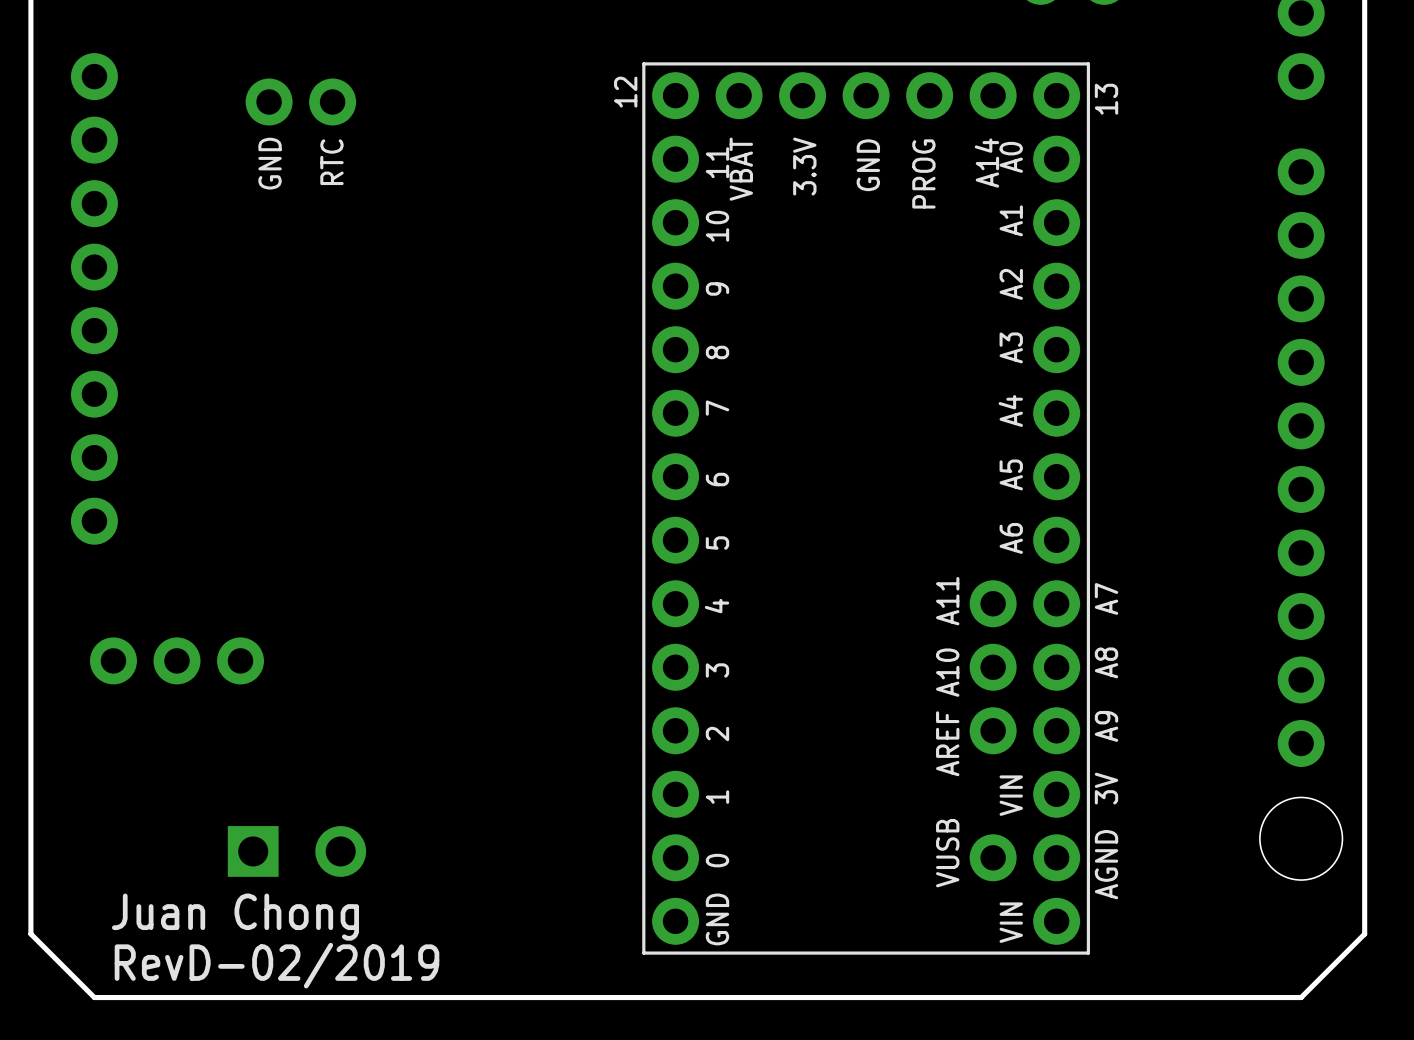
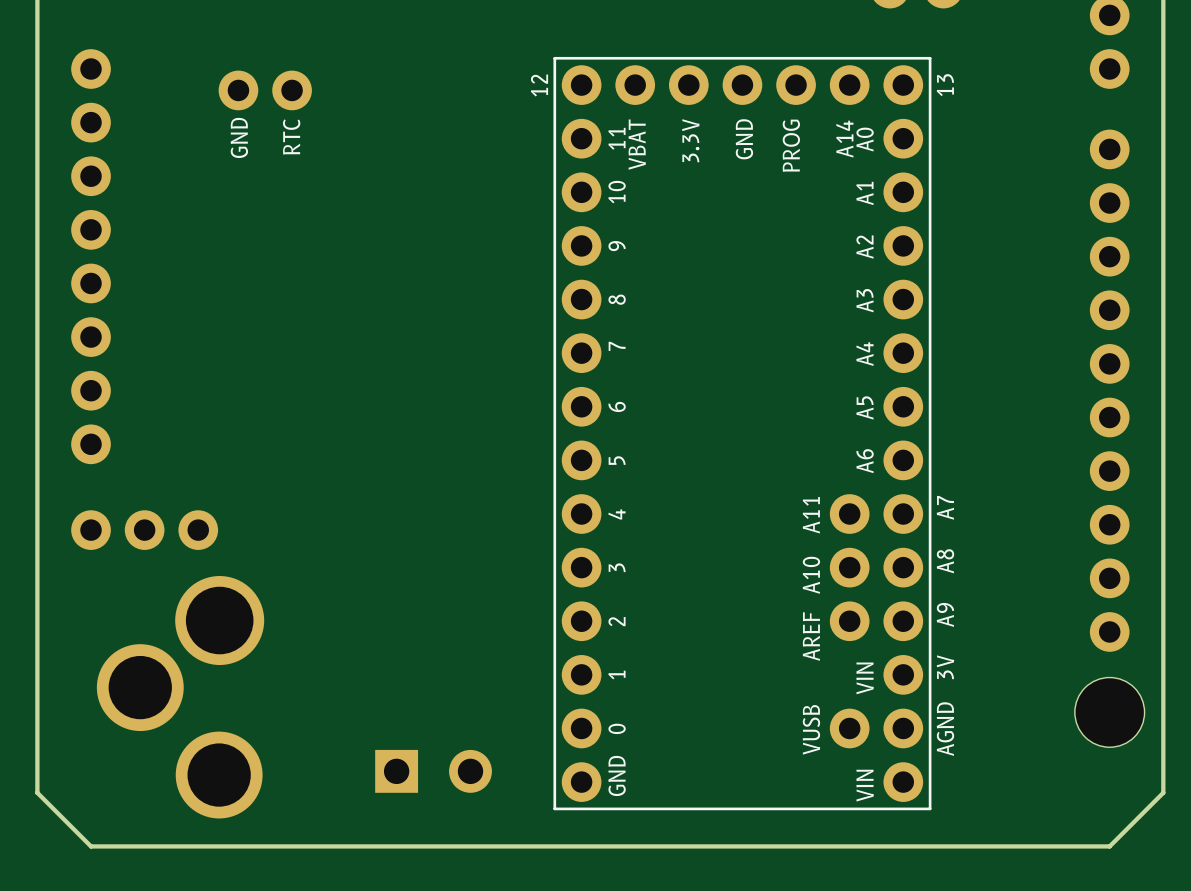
part position: (176, 660) -> (144, 530)
part: none -> (180, 697)
part position: (296, 851) -> (433, 771)
text: Juan Chong (235, 917) -> none
text: RevD-02/2019 (276, 965) -> none

